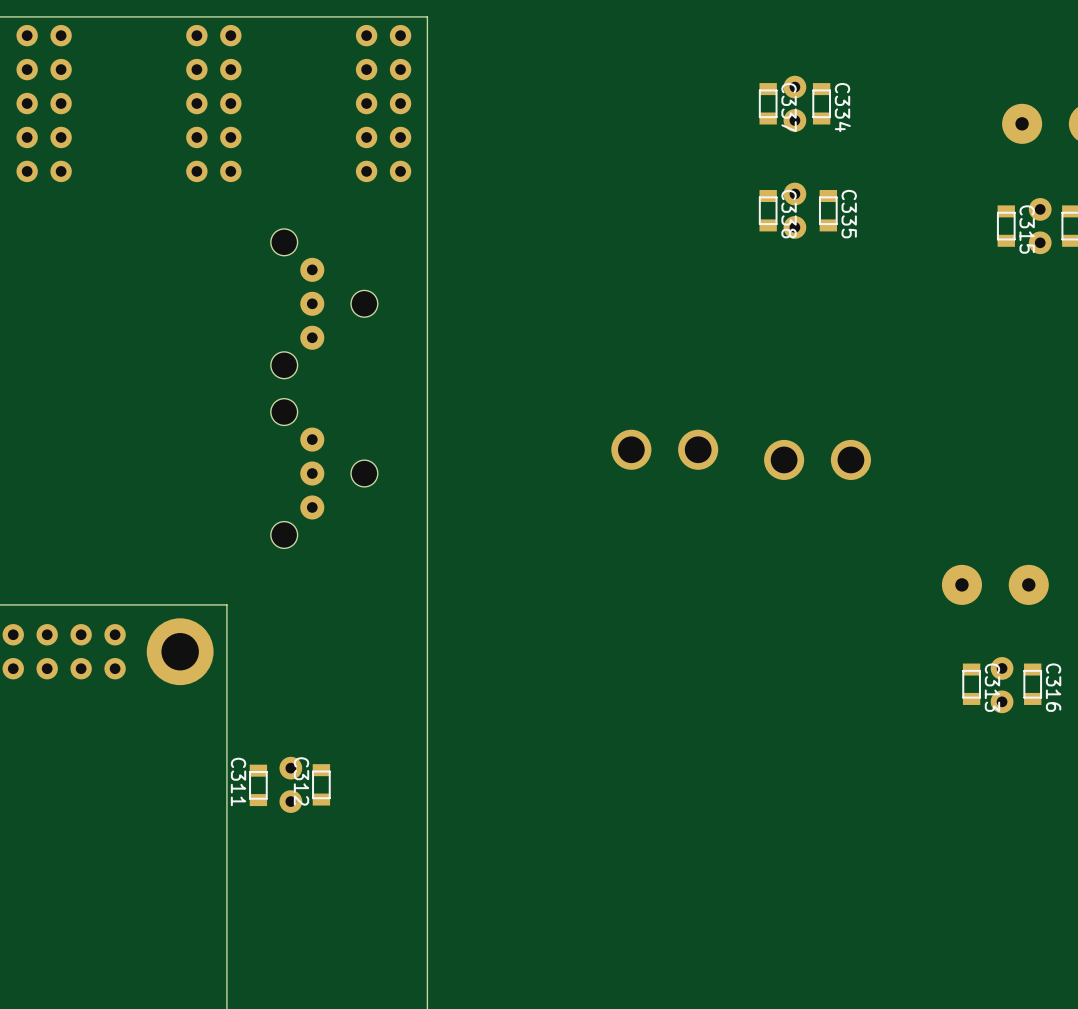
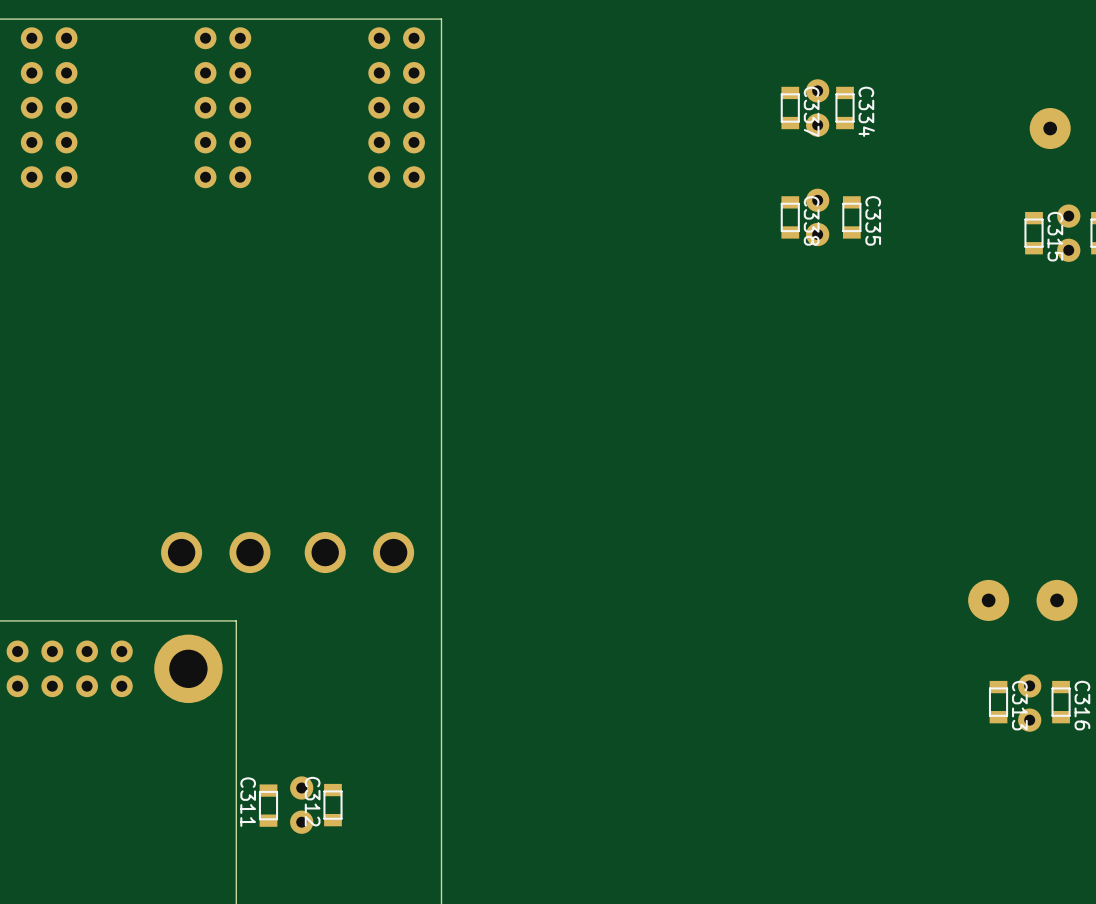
part: (324, 303) -> none
part: (664, 449) -> none
part: (817, 459) -> none
part: (324, 473) -> none
part: none -> (215, 552)
part: none -> (359, 552)

